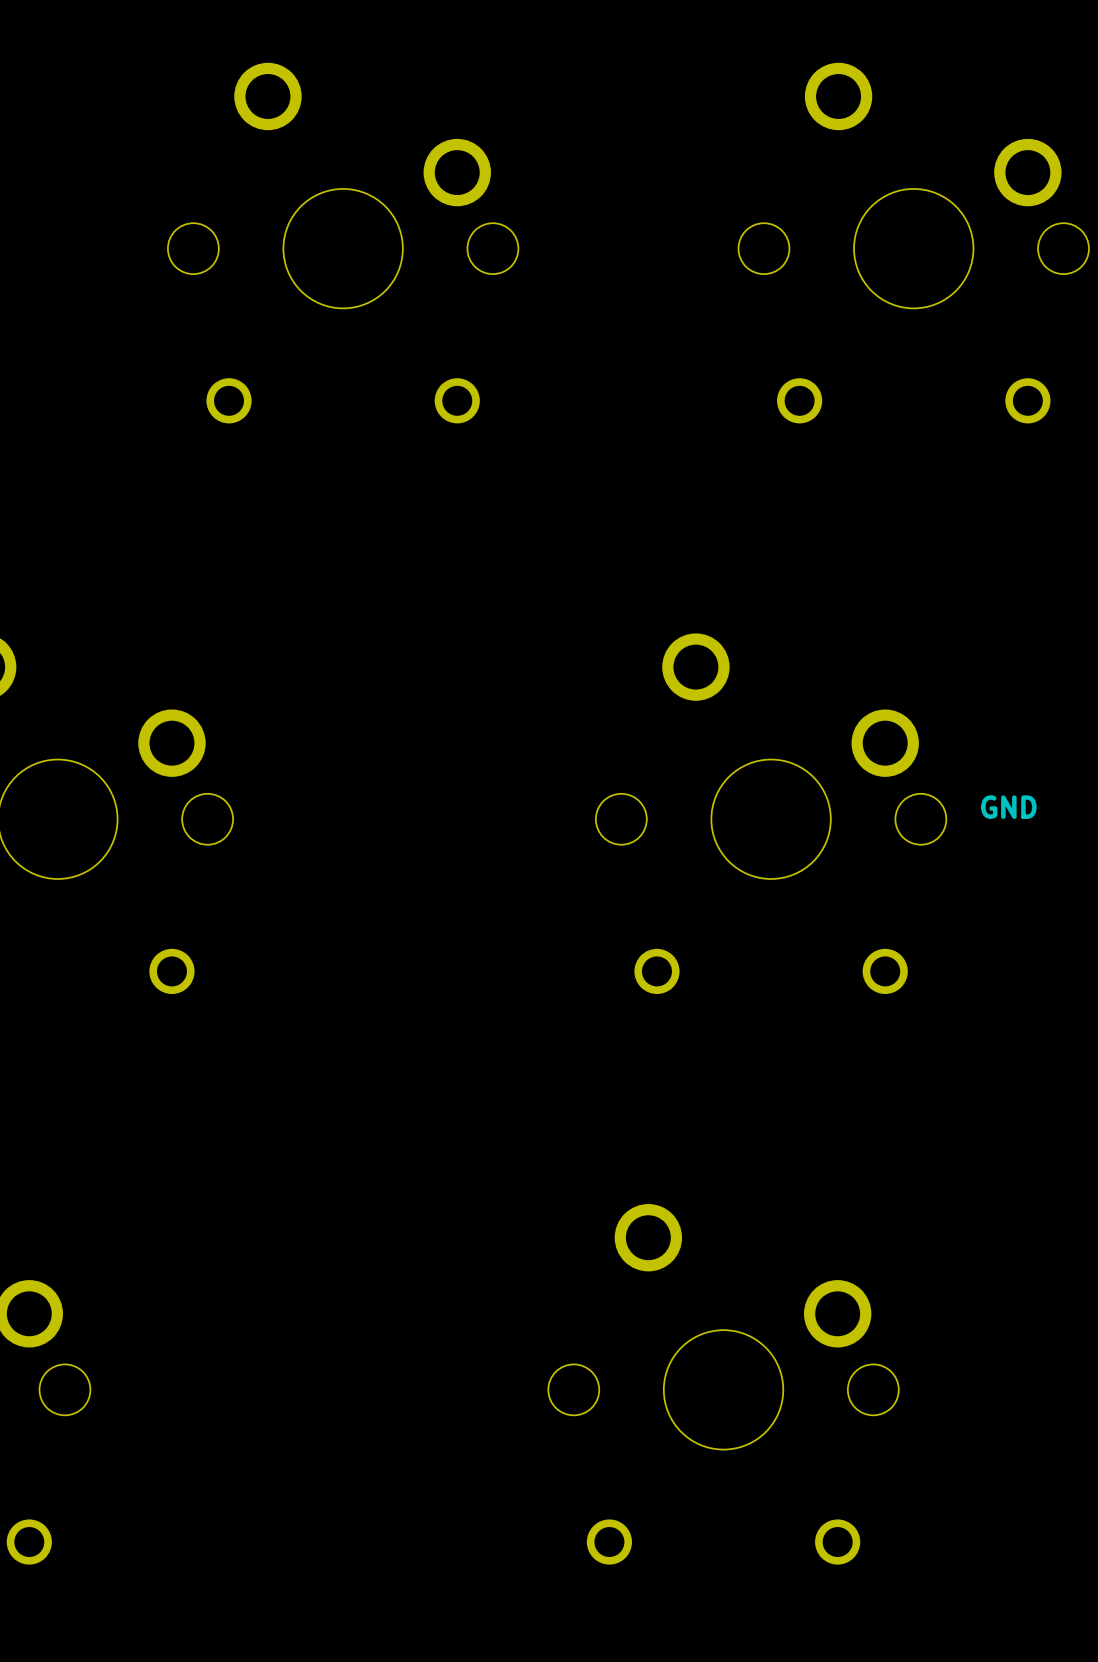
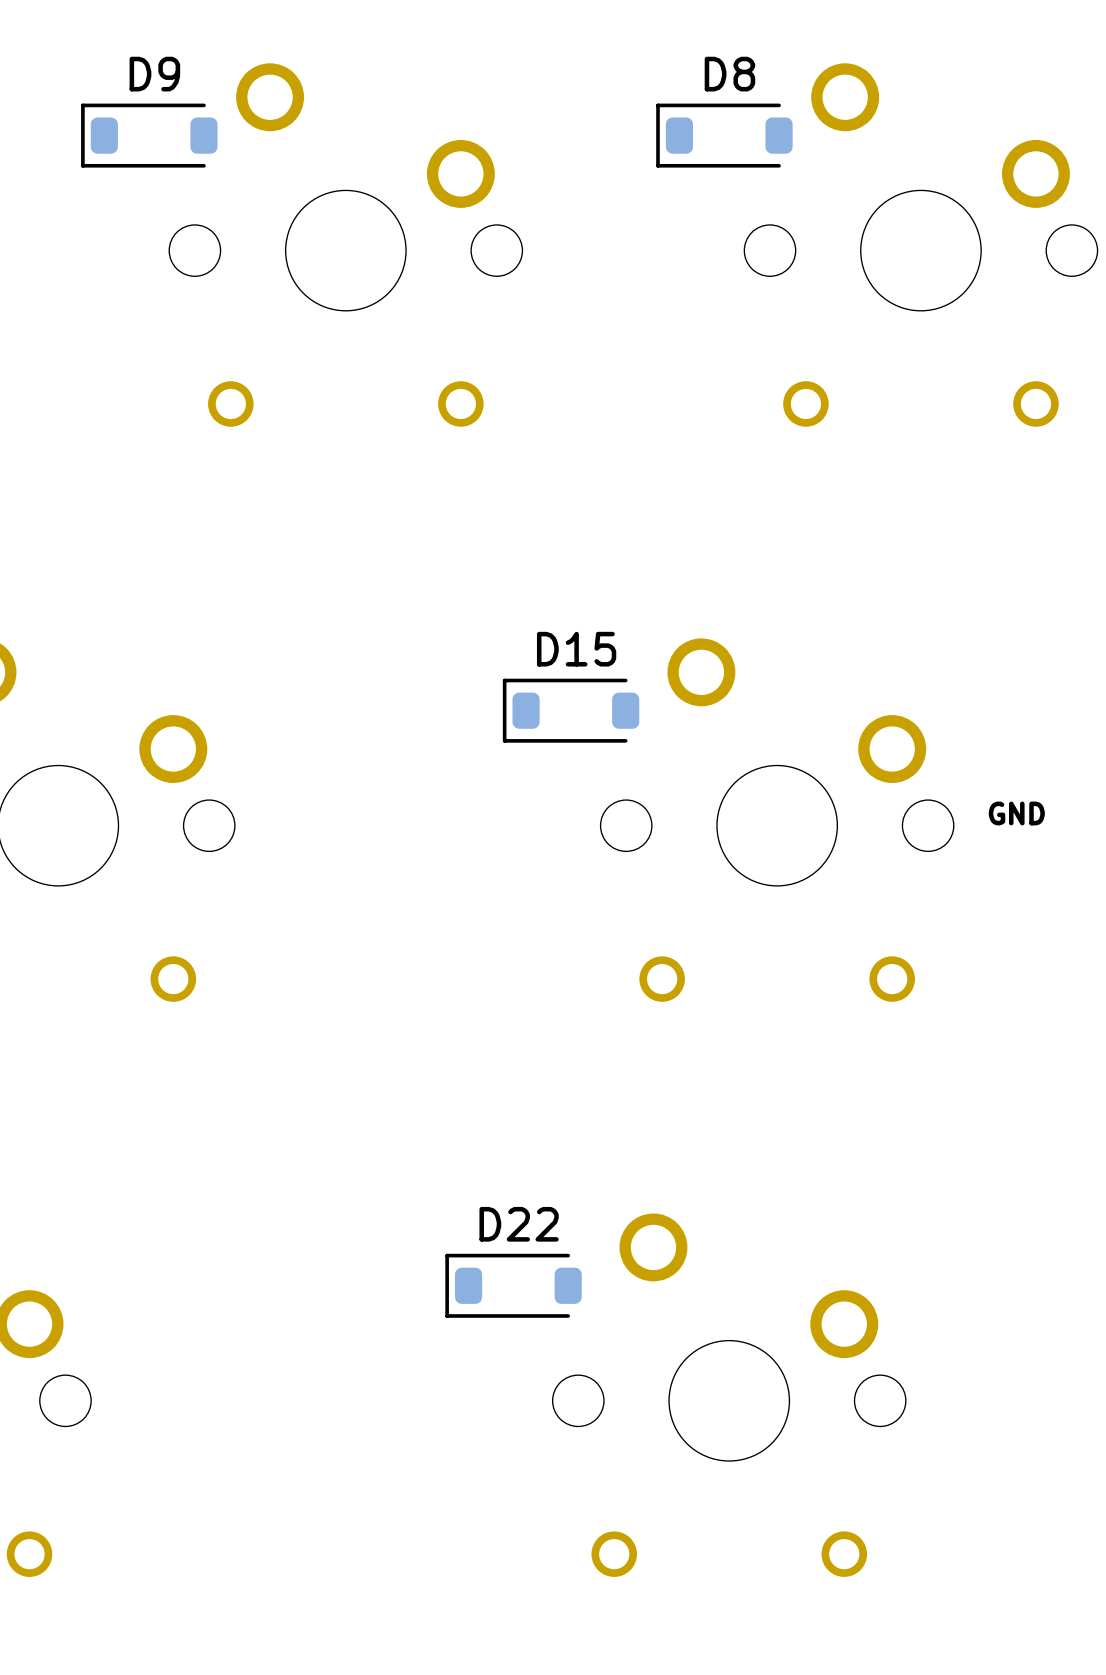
D9: none -> (149, 135)
D8: none -> (724, 135)
D15: none -> (571, 710)
D22: none -> (513, 1285)

